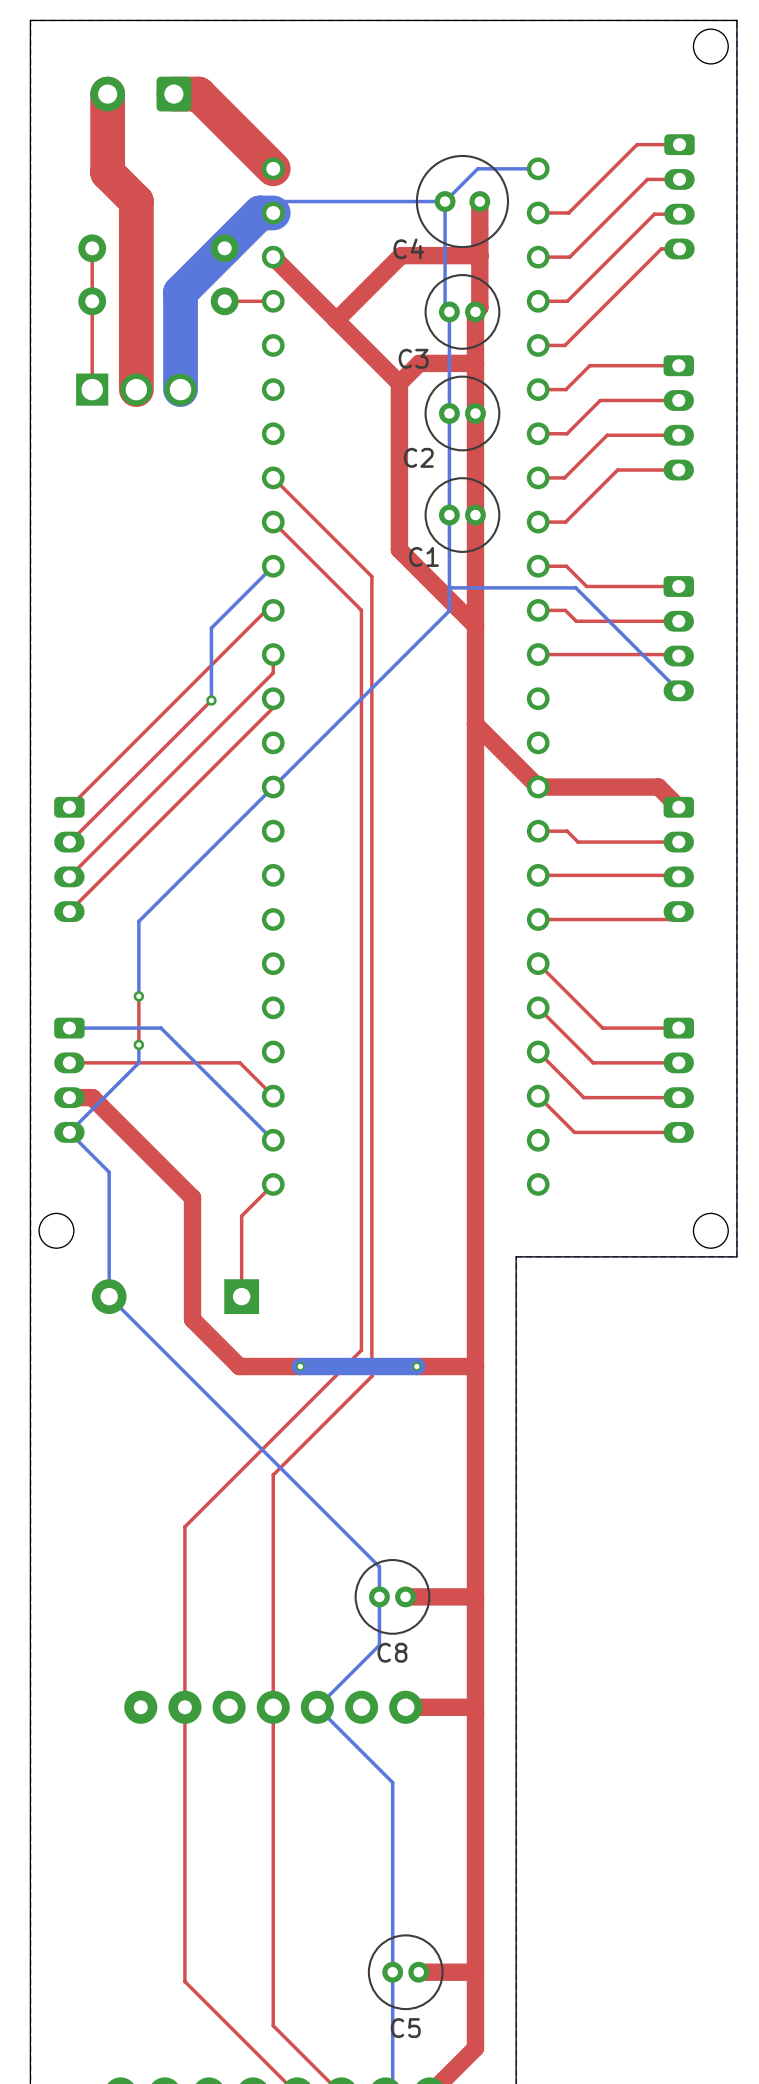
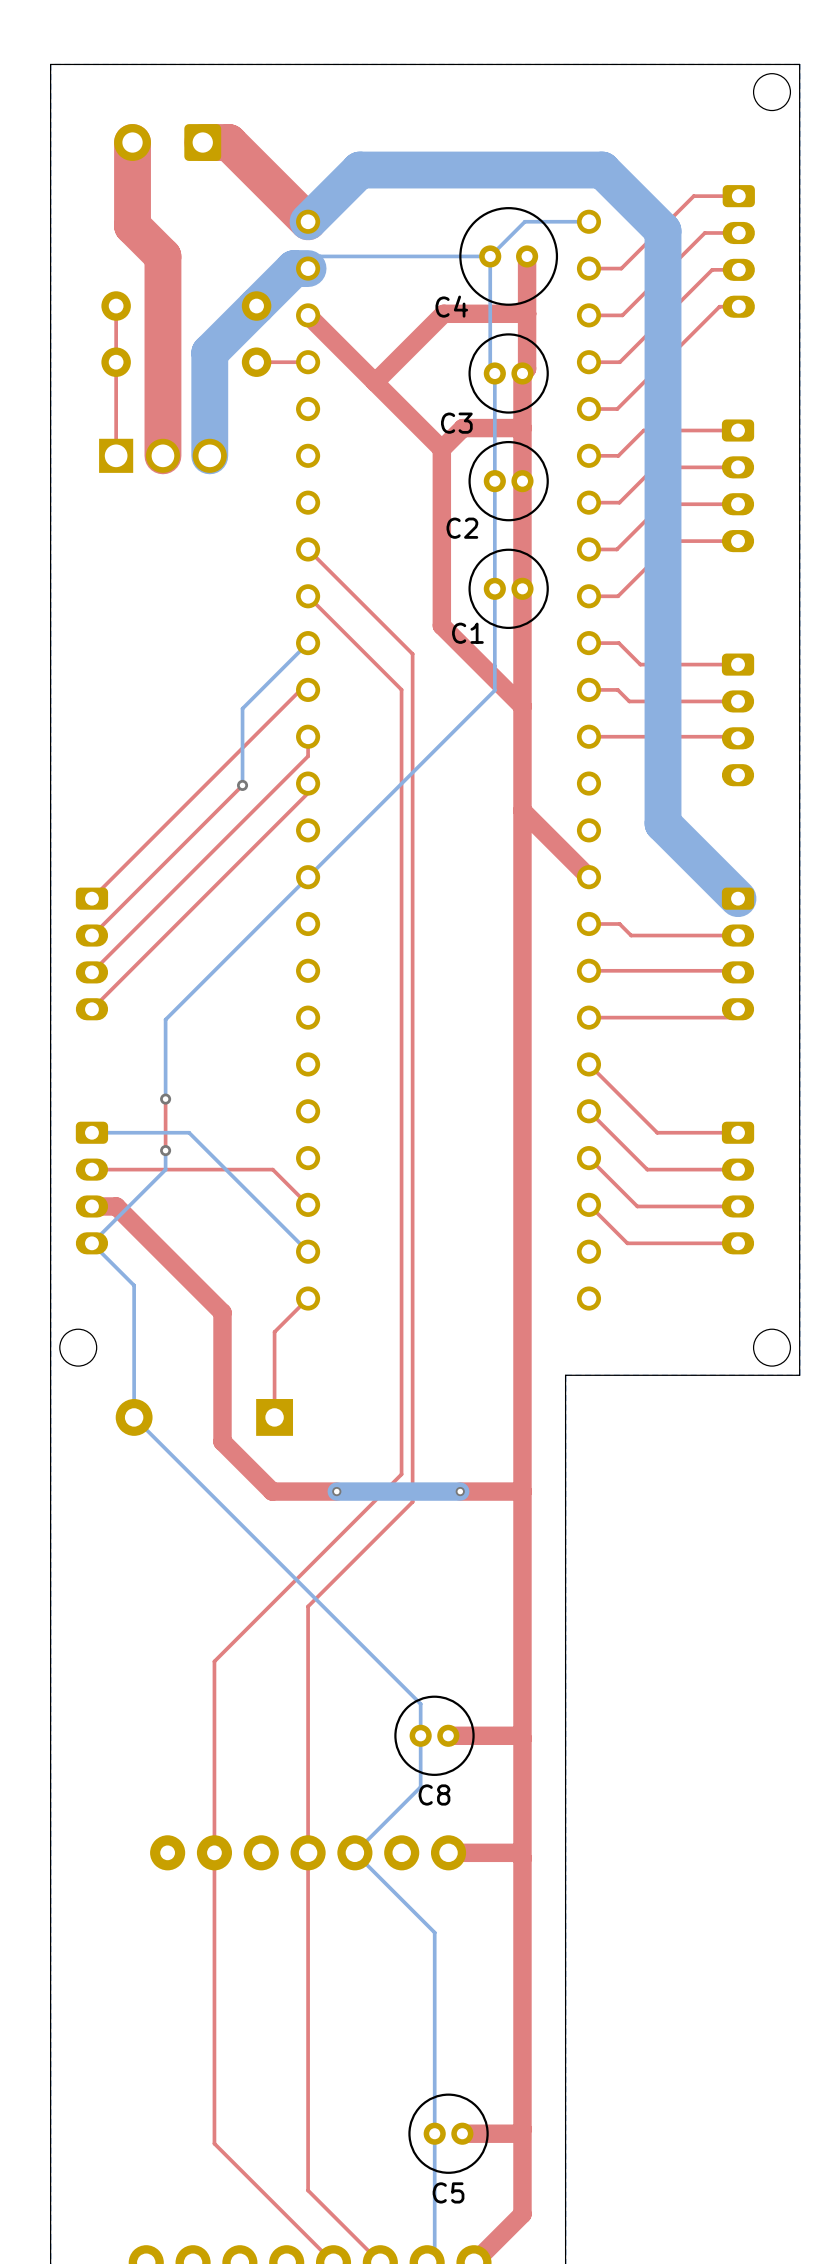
bottom track: none -> (308, 221) (359, 170) (602, 170) (663, 230) (663, 823) (738, 898)
bottom track: (449, 587) (575, 587) (678, 690) -> none
top track: (538, 787) (658, 787) (678, 807) -> none

